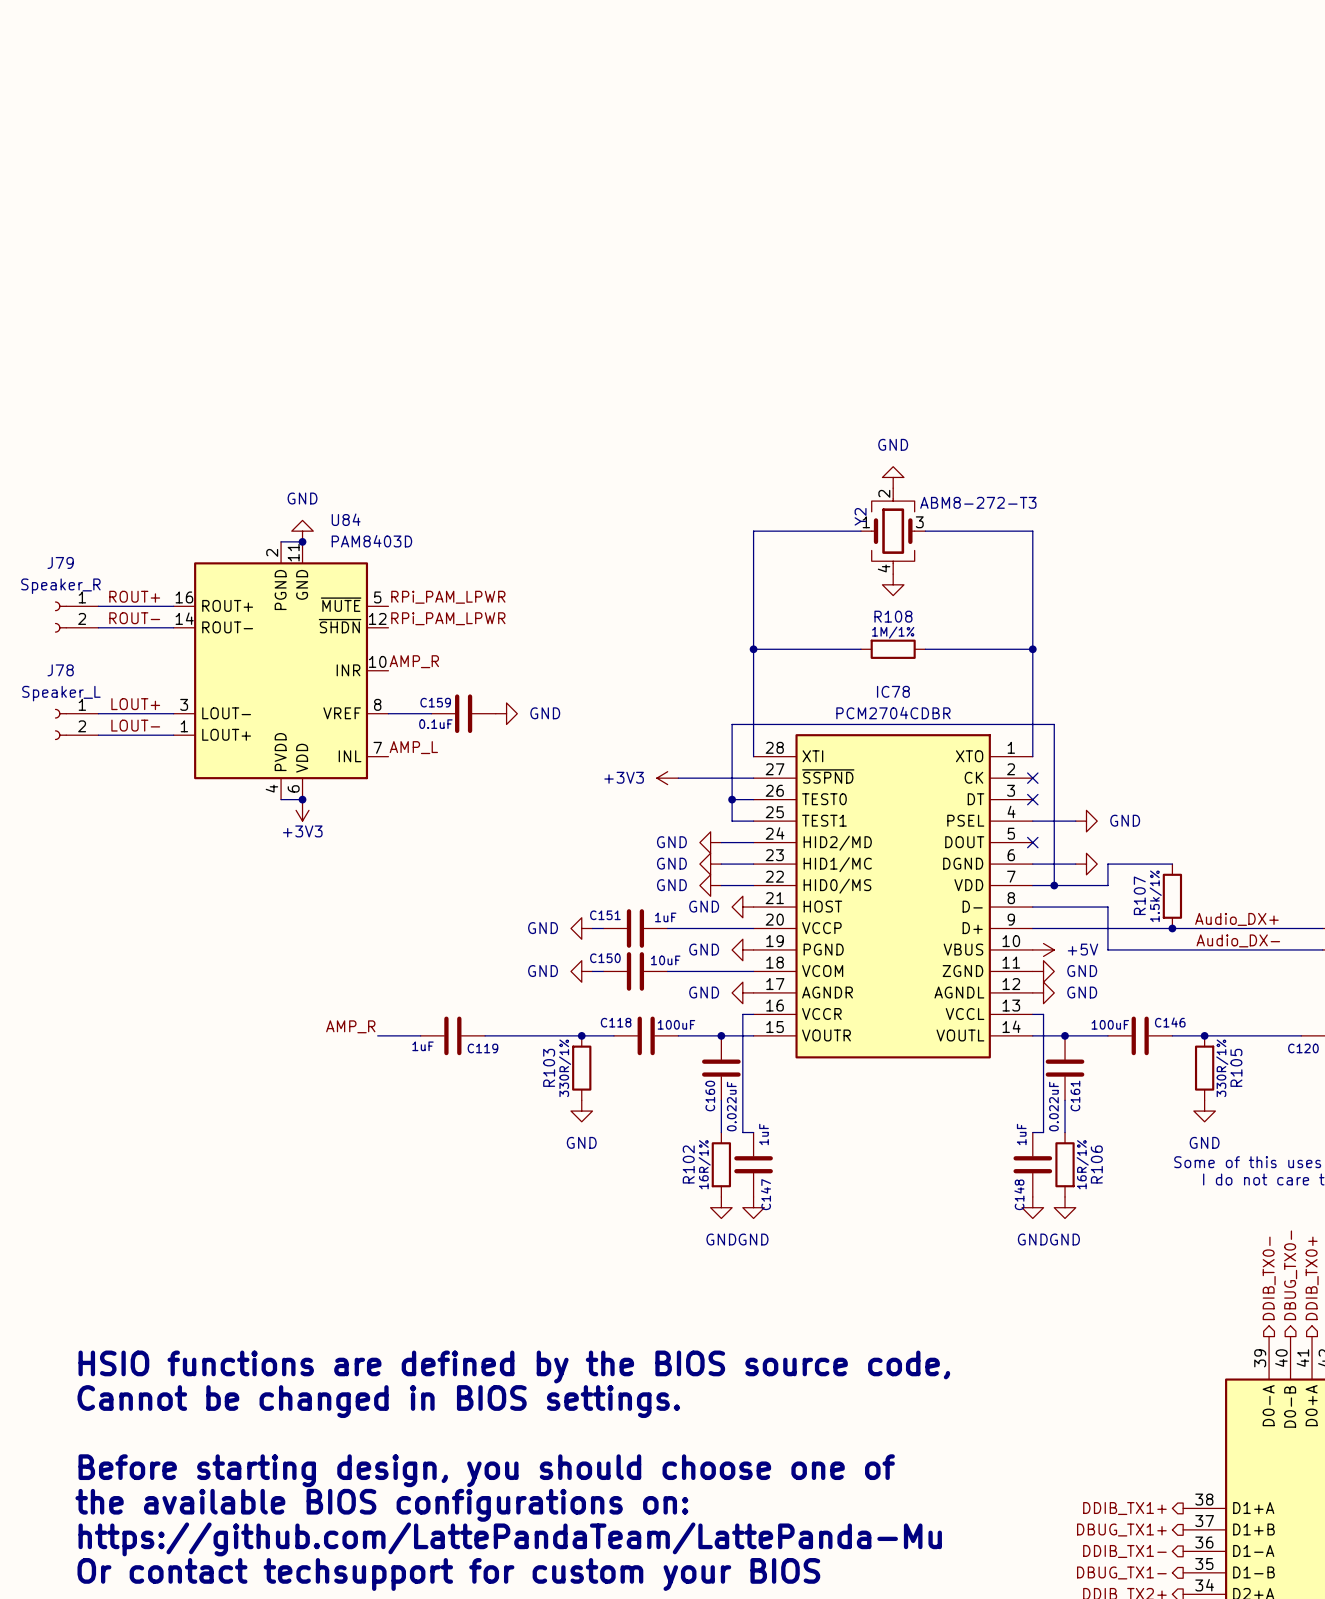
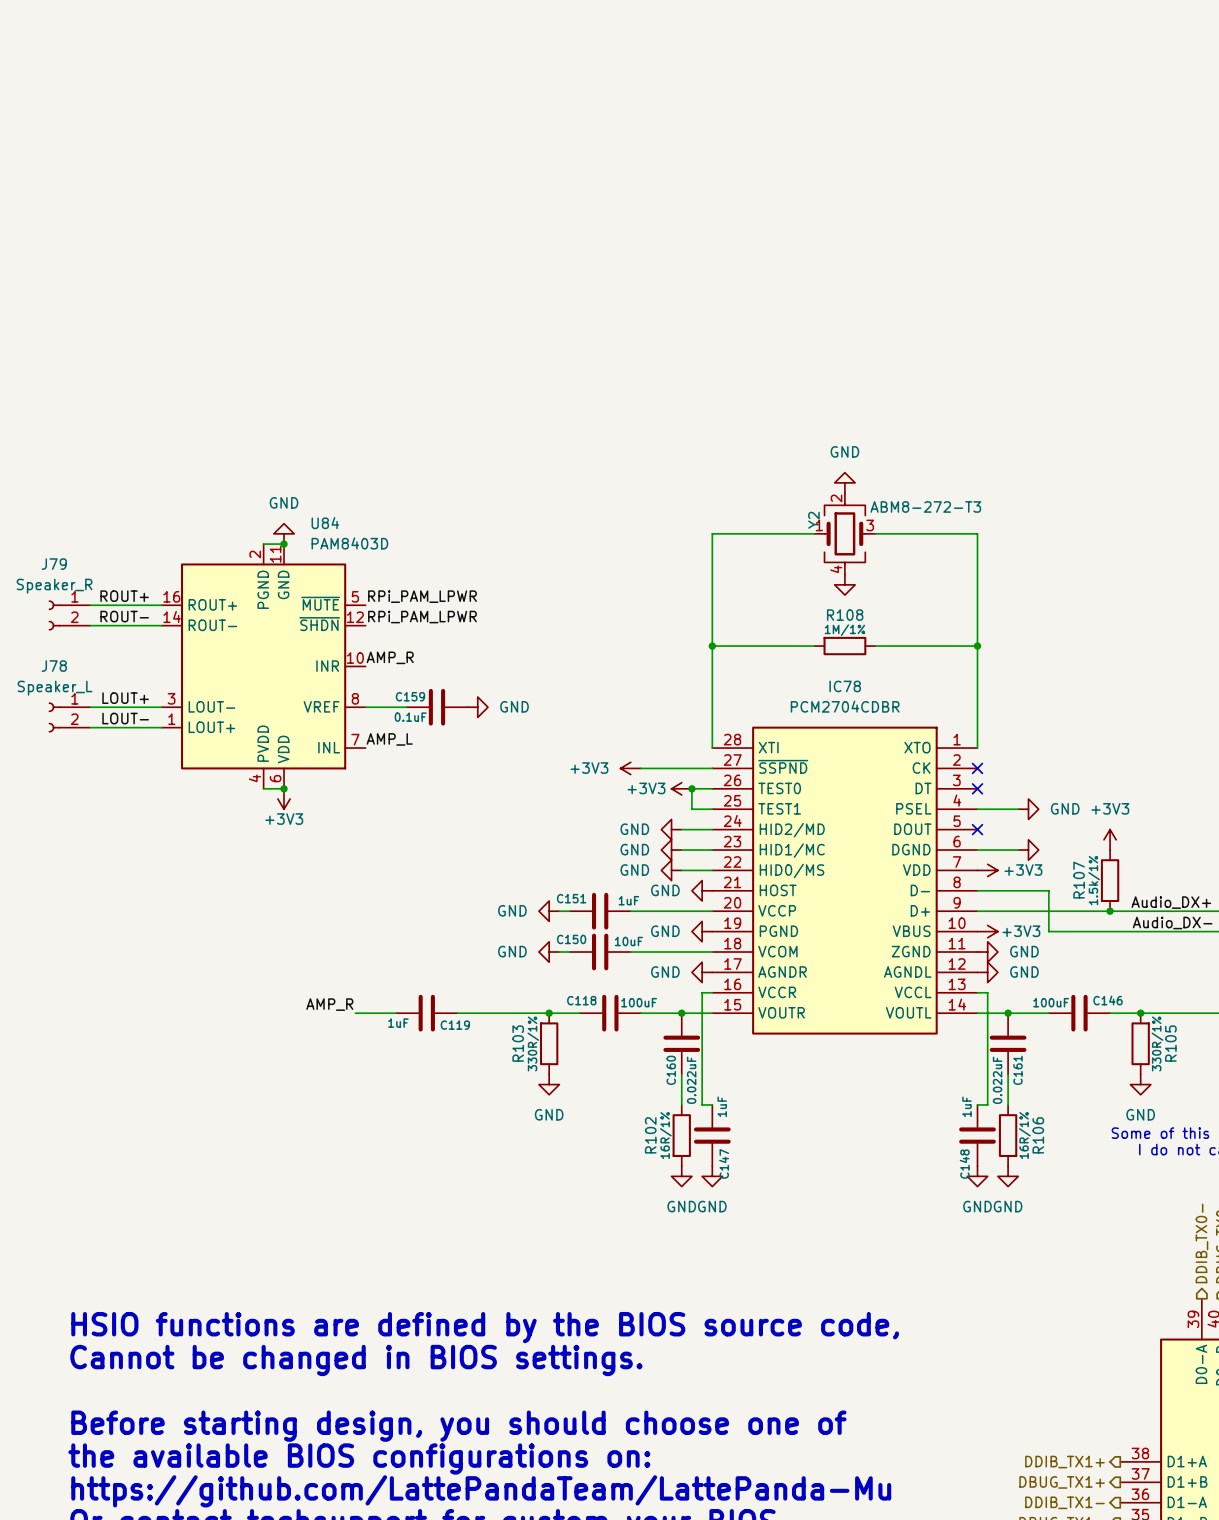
power symbol: none -> +3V3 (681, 788)
wire: (732, 799) (732, 724) (1054, 724) (1054, 885) -> none
power symbol: none -> +3V3 (1110, 839)
wire: (1172, 864) (1107, 864) (1107, 885) (1032, 885) -> none
power symbol: none -> +3V3 (987, 870)
junction: (1054, 885) -> none
power symbol: +5V (1043, 949) -> +3V3 (987, 931)

